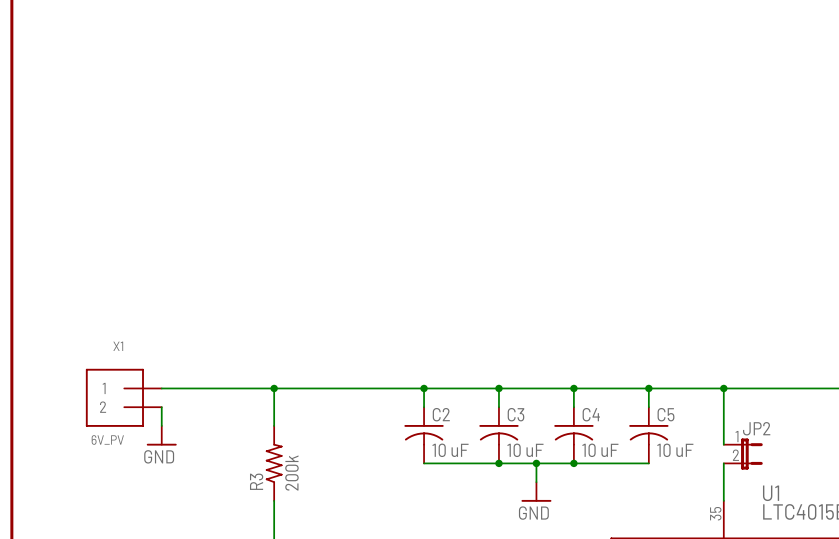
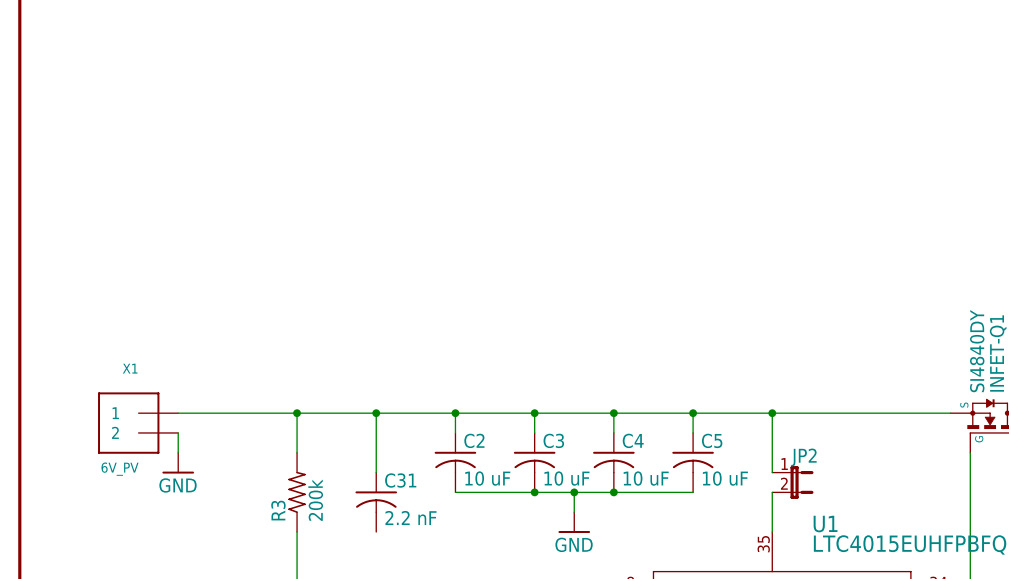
wire: none -> (376, 413) (376, 472)
junction: none -> (376, 413)
C31: none -> 2.2 nF (376, 502)

